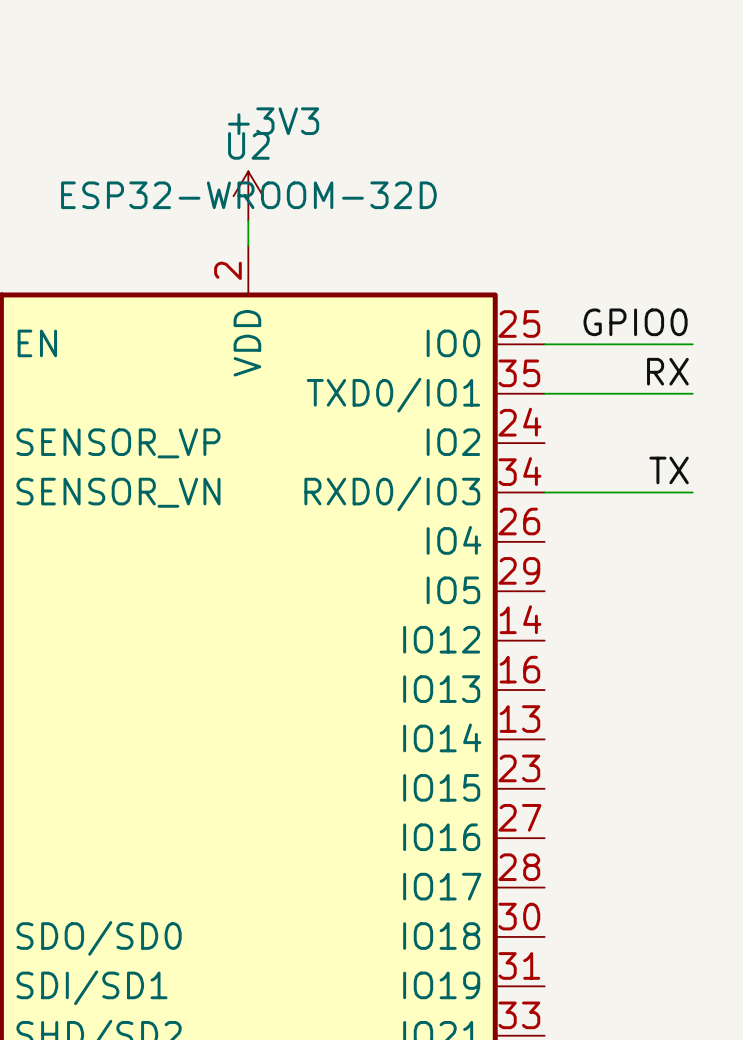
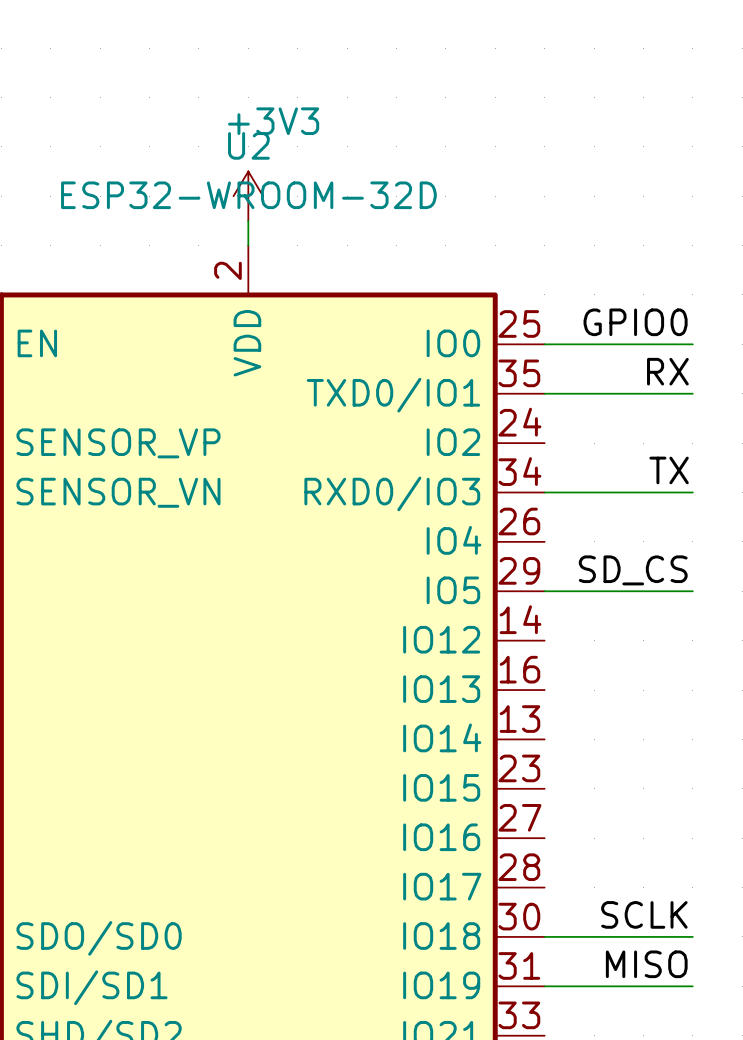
label: none -> SD_CS (633, 570)
wire: none -> (544, 591) (692, 591)
label: none -> SCLK (644, 914)
wire: none -> (544, 936) (692, 936)
label: none -> MISO (646, 964)
wire: none -> (544, 986) (692, 986)

